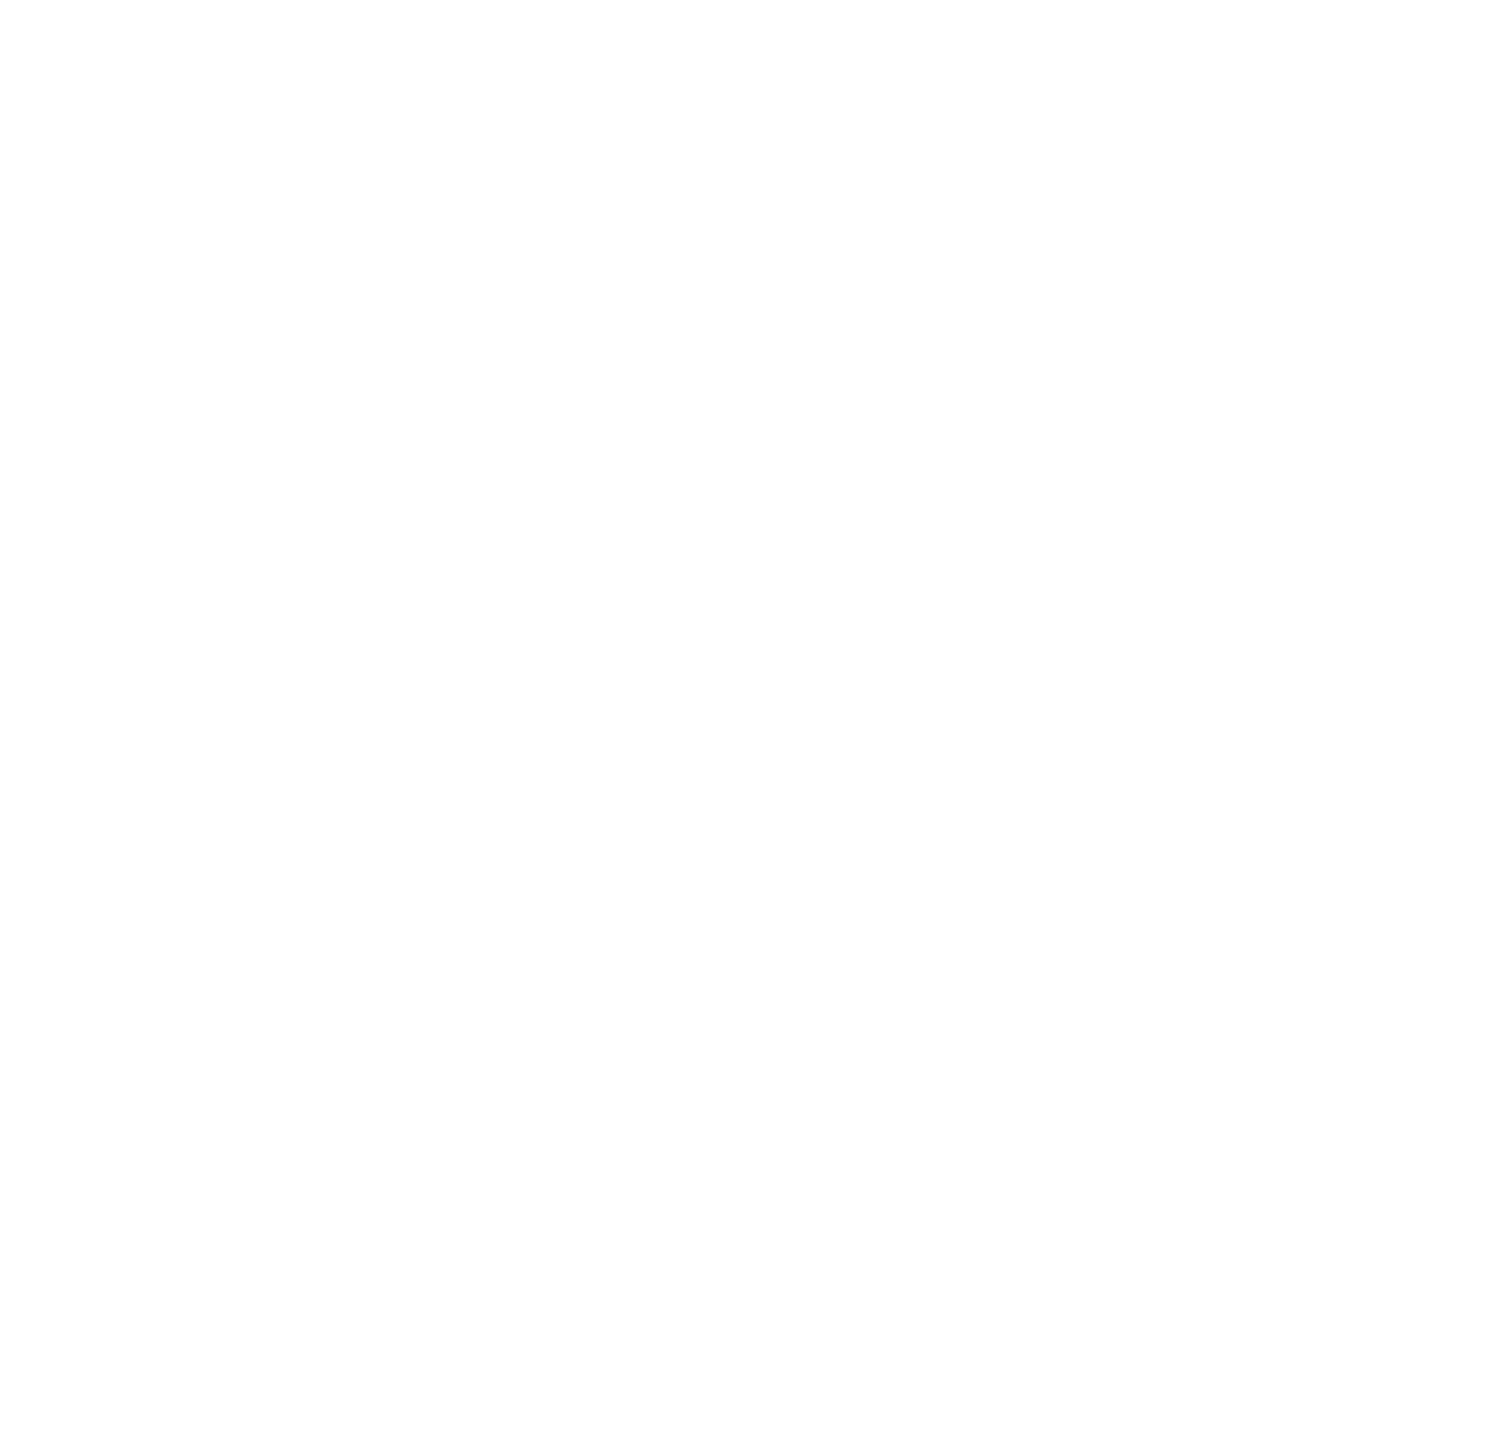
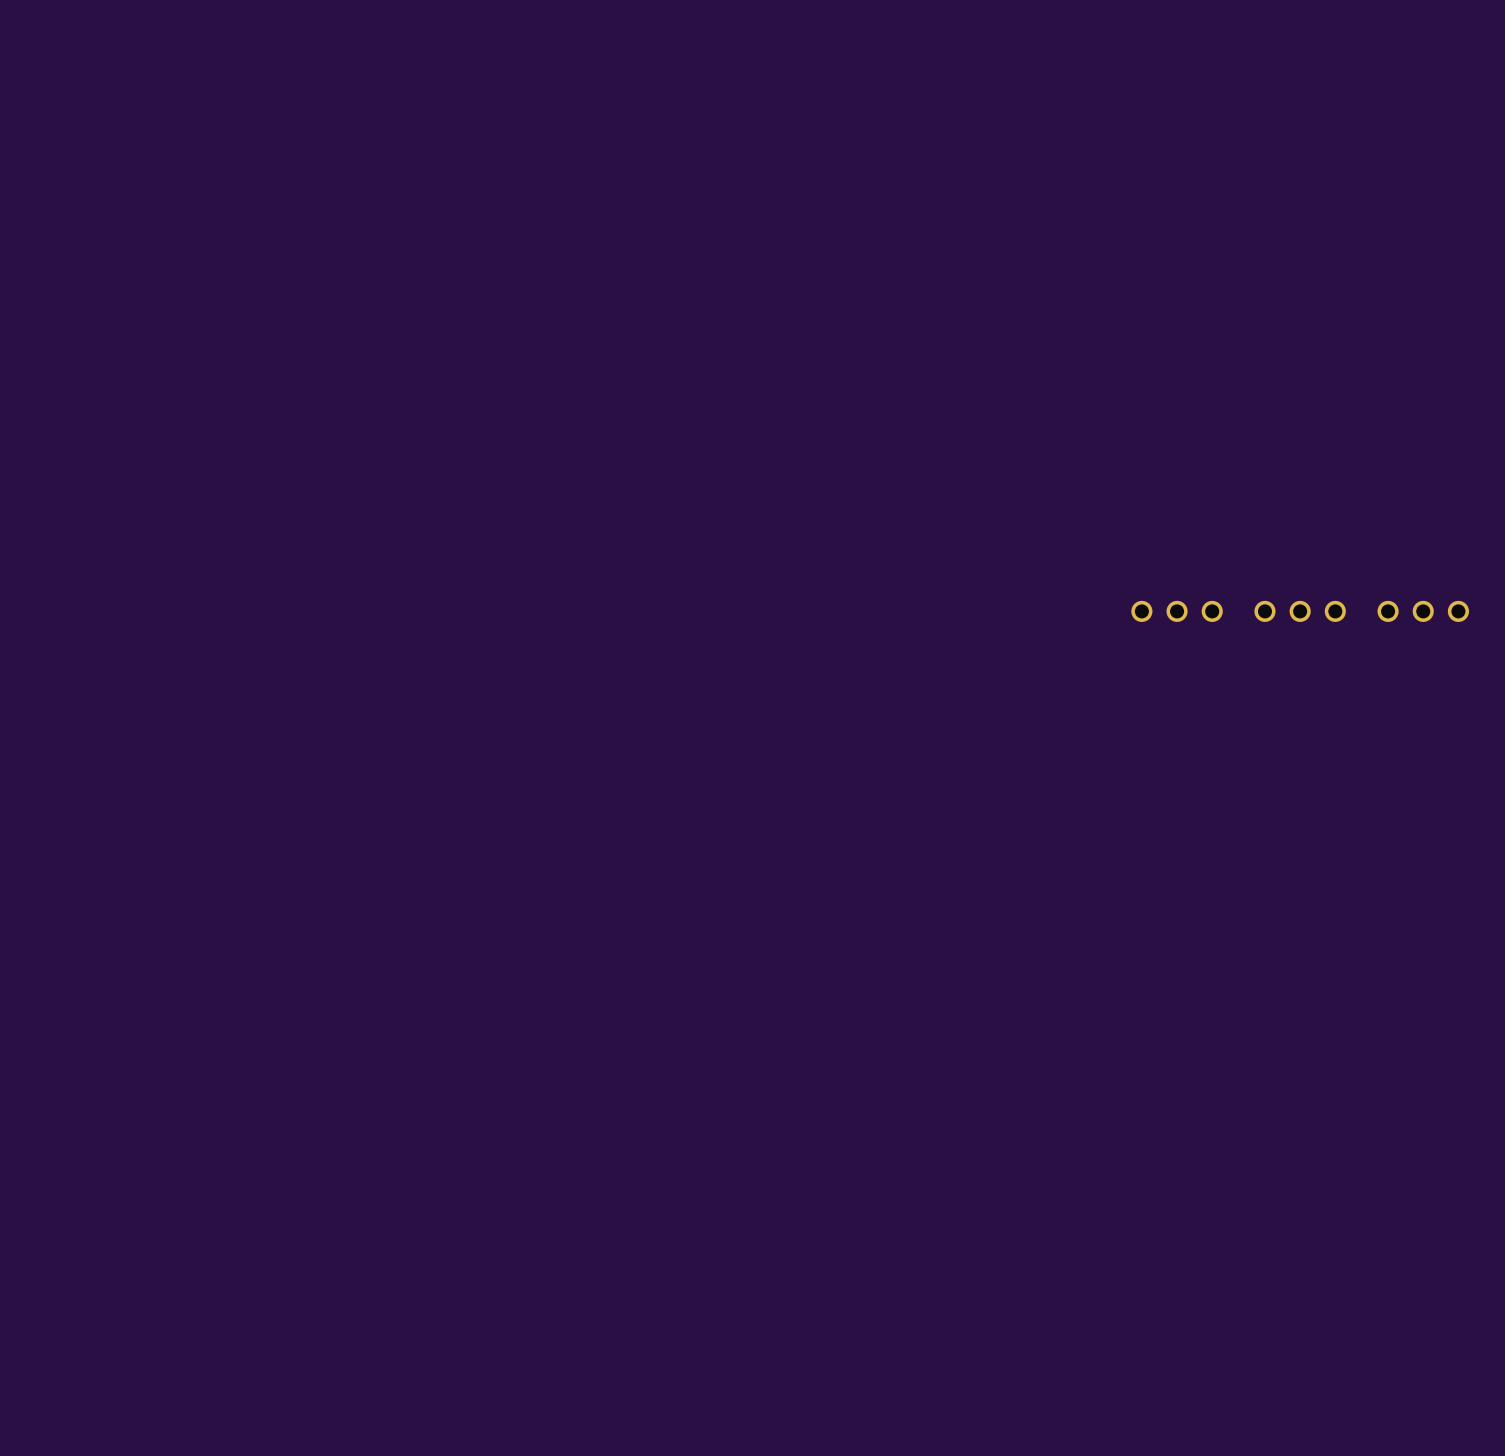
part: none -> (1177, 611)
part: none -> (1300, 611)
part: none -> (1423, 611)

